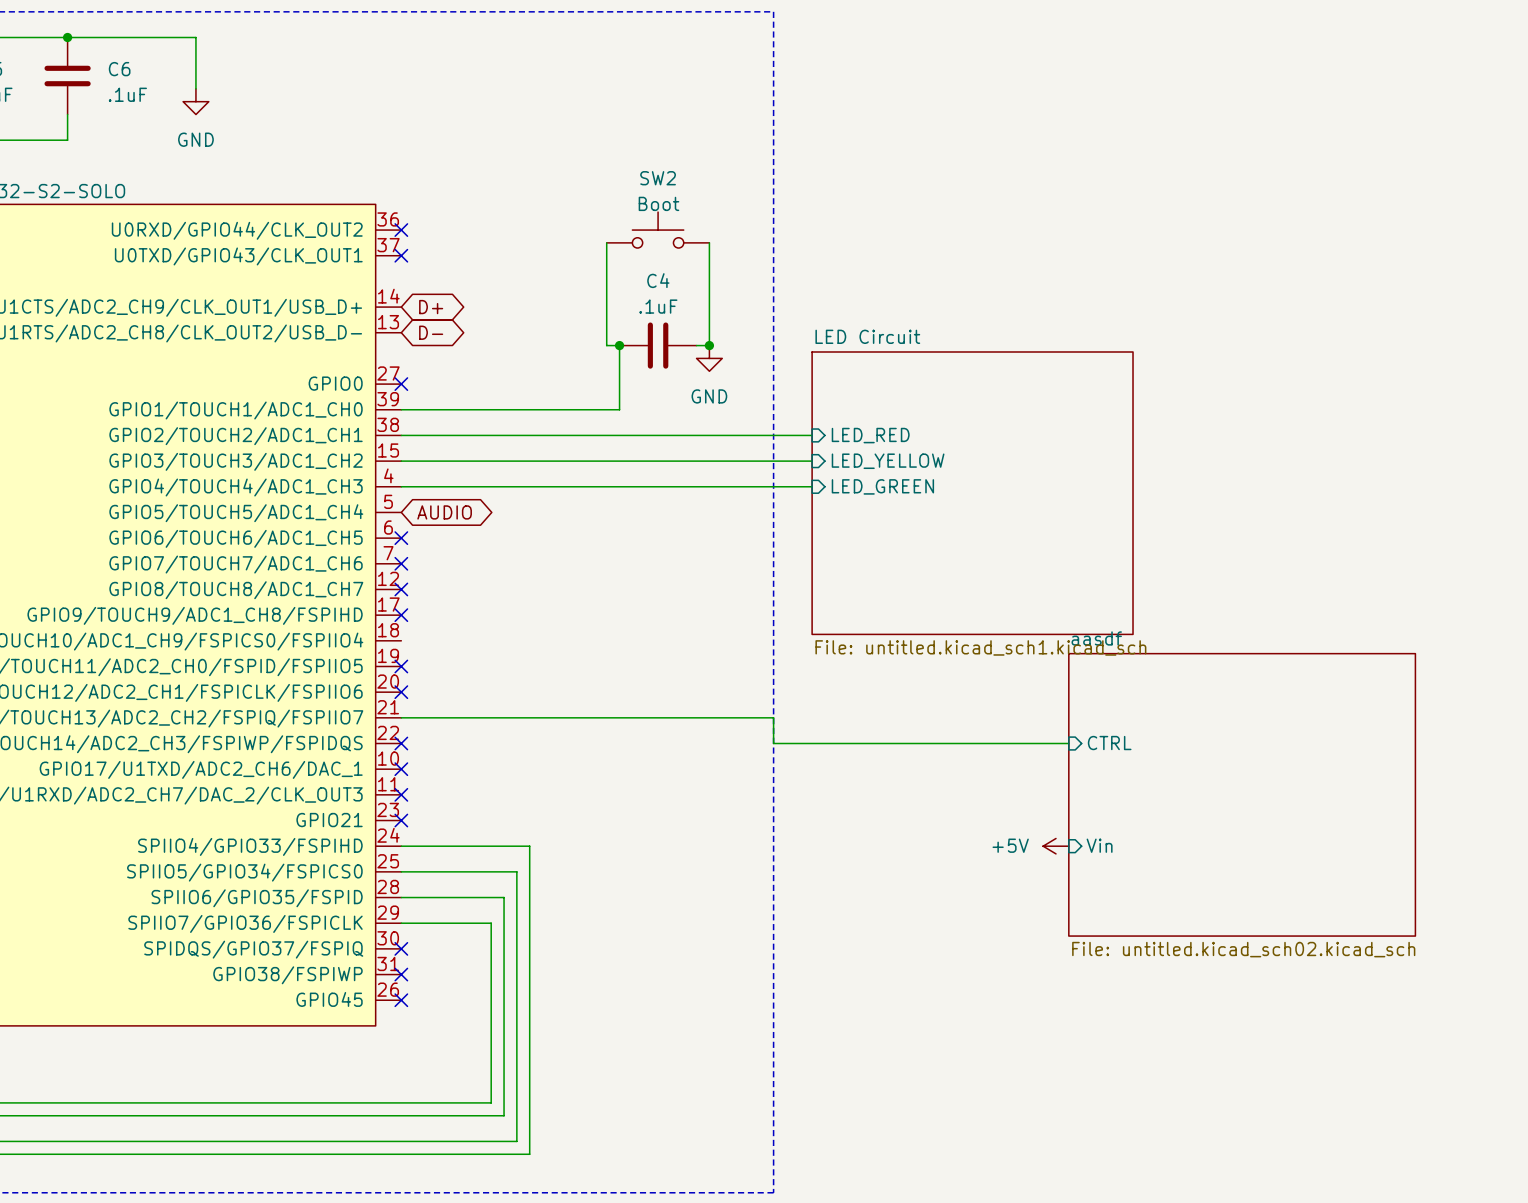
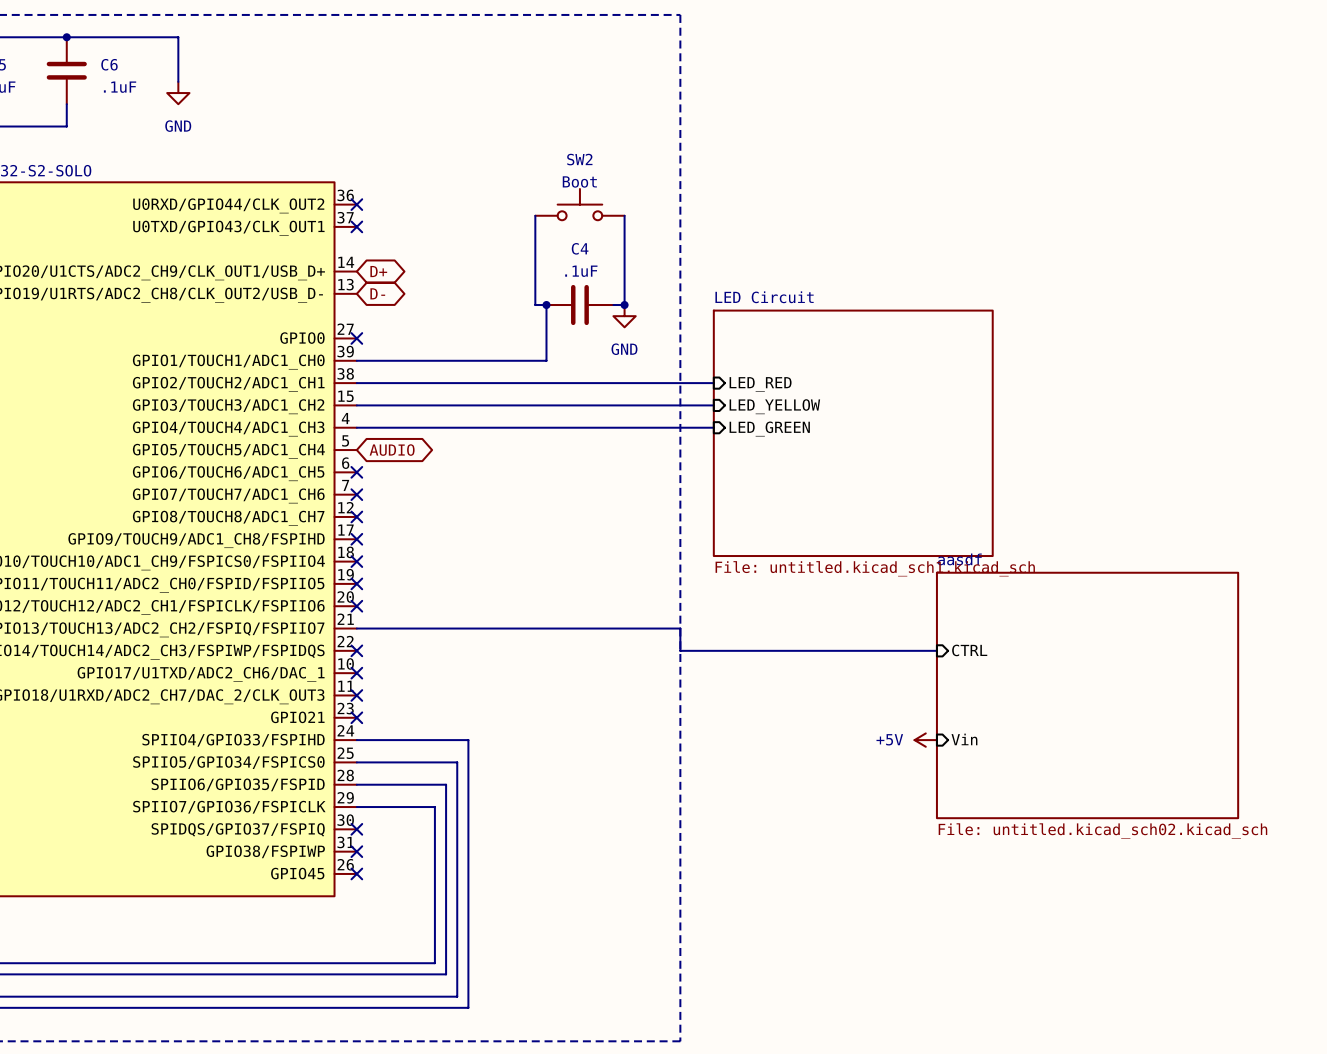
no-connect mark: none -> (356, 561)

